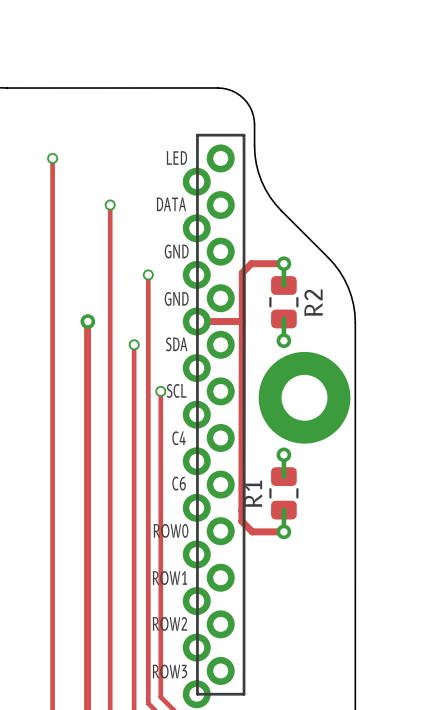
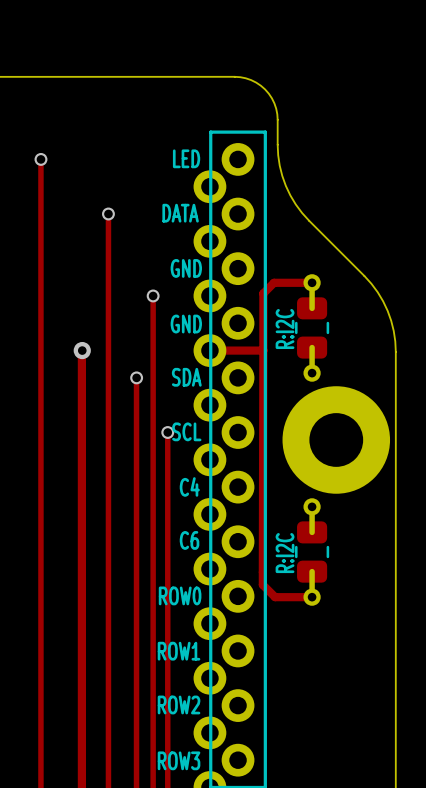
R2 name: R2 (313, 302) -> none
R2 value: none -> R:I2C (285, 328)
R1 name: R1 (252, 493) -> none
R1 value: none -> R:I2C (285, 553)

